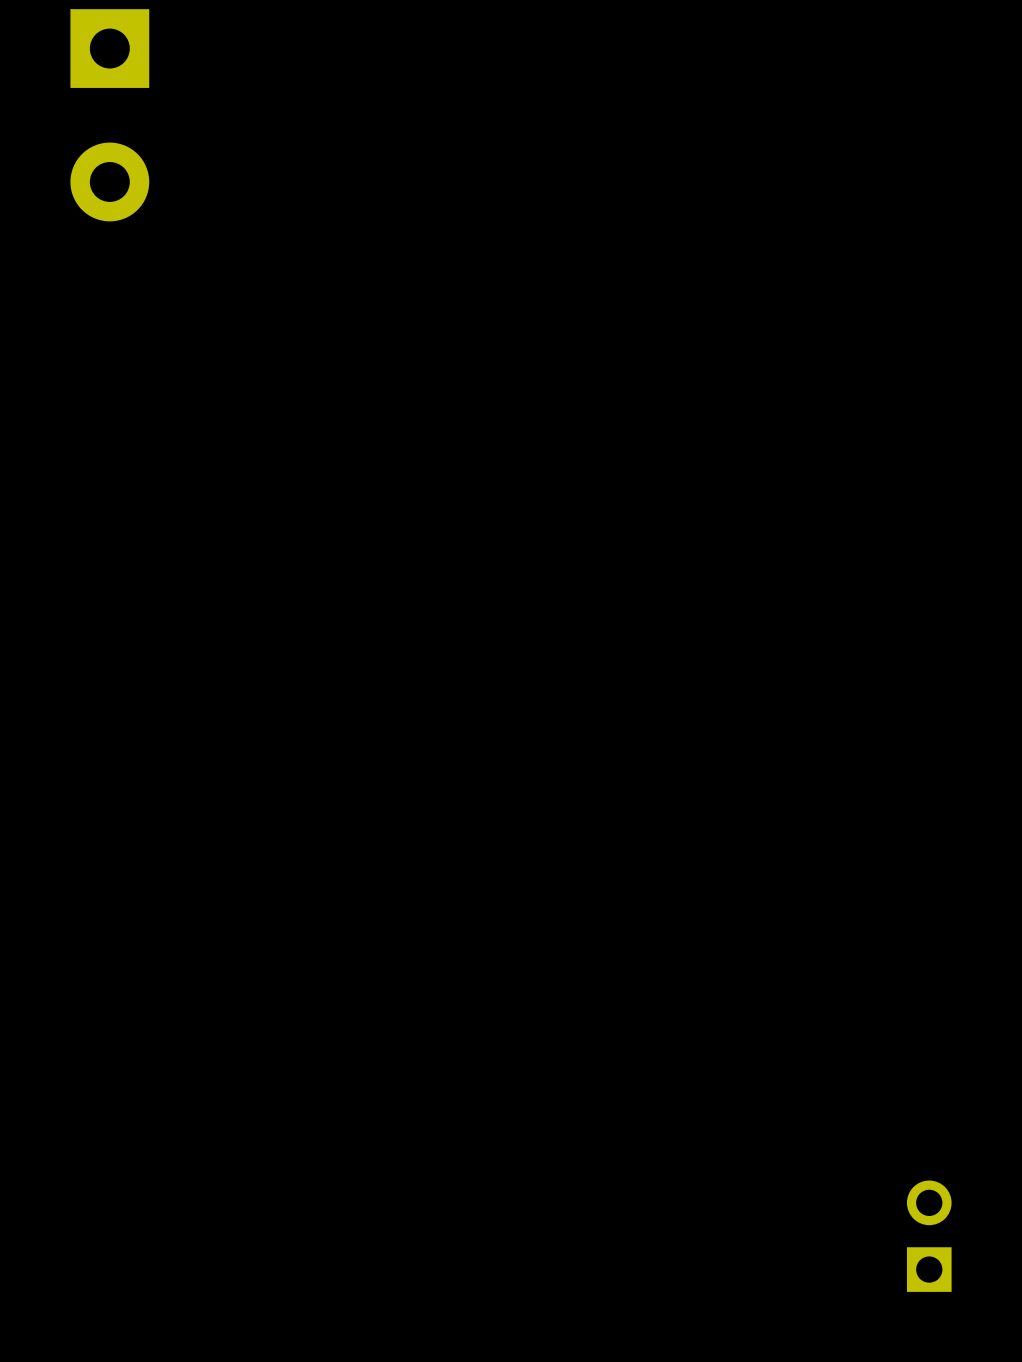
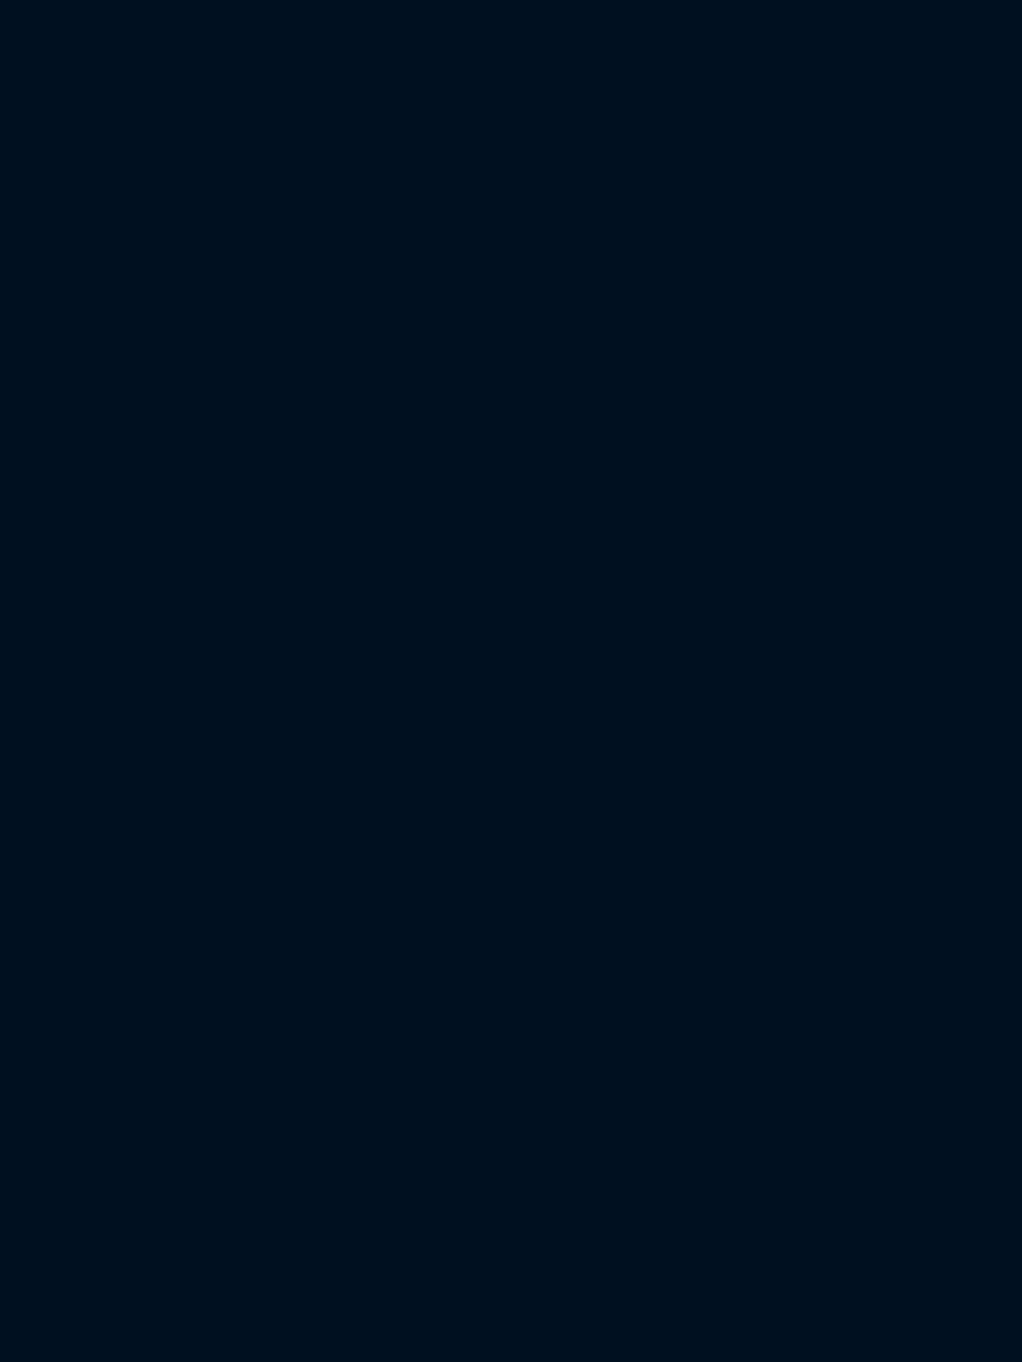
part: (109, 115) -> none
part: (929, 1236) -> none

